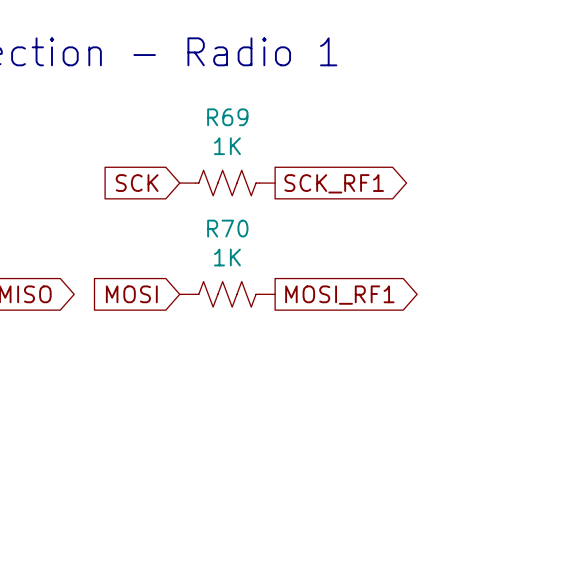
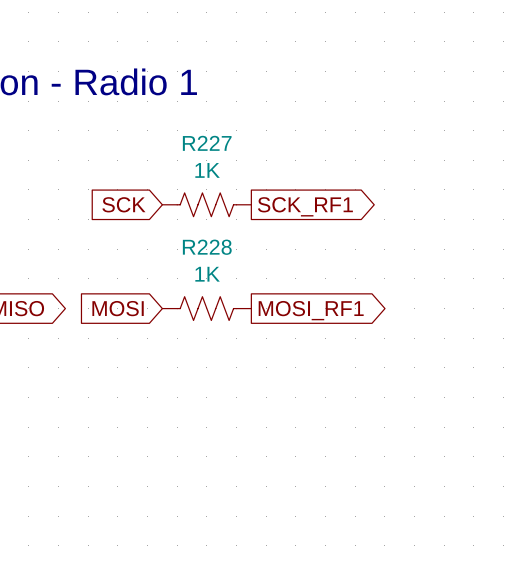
R69 name: R69 (227, 117) -> R227 (207, 143)
R70 name: R70 (227, 228) -> R228 (207, 247)

